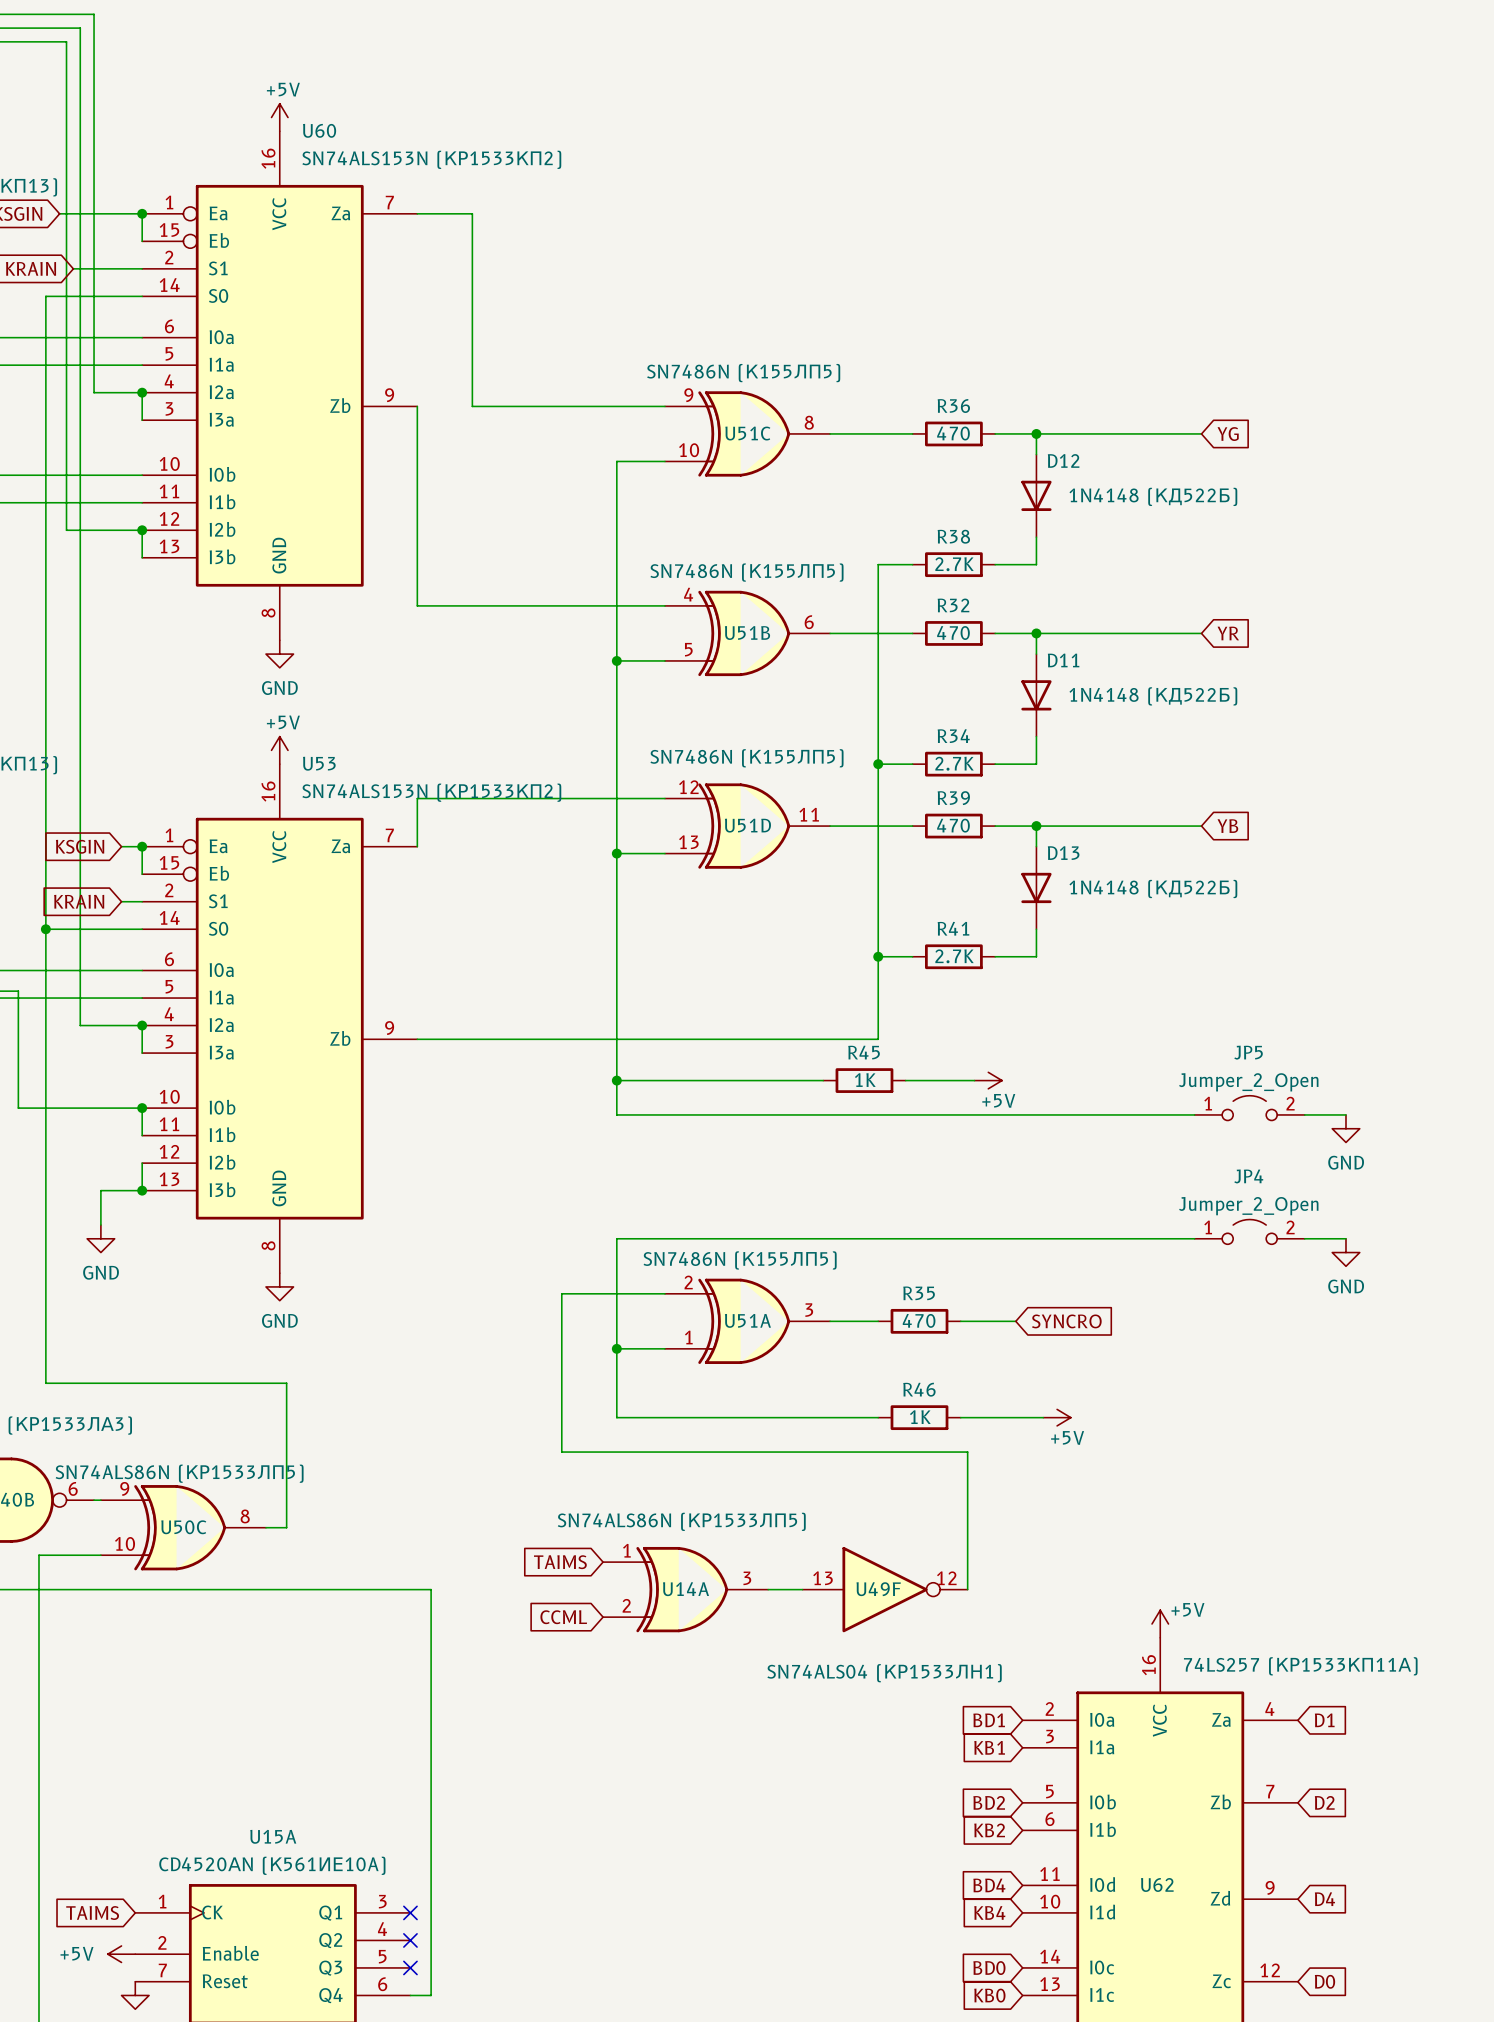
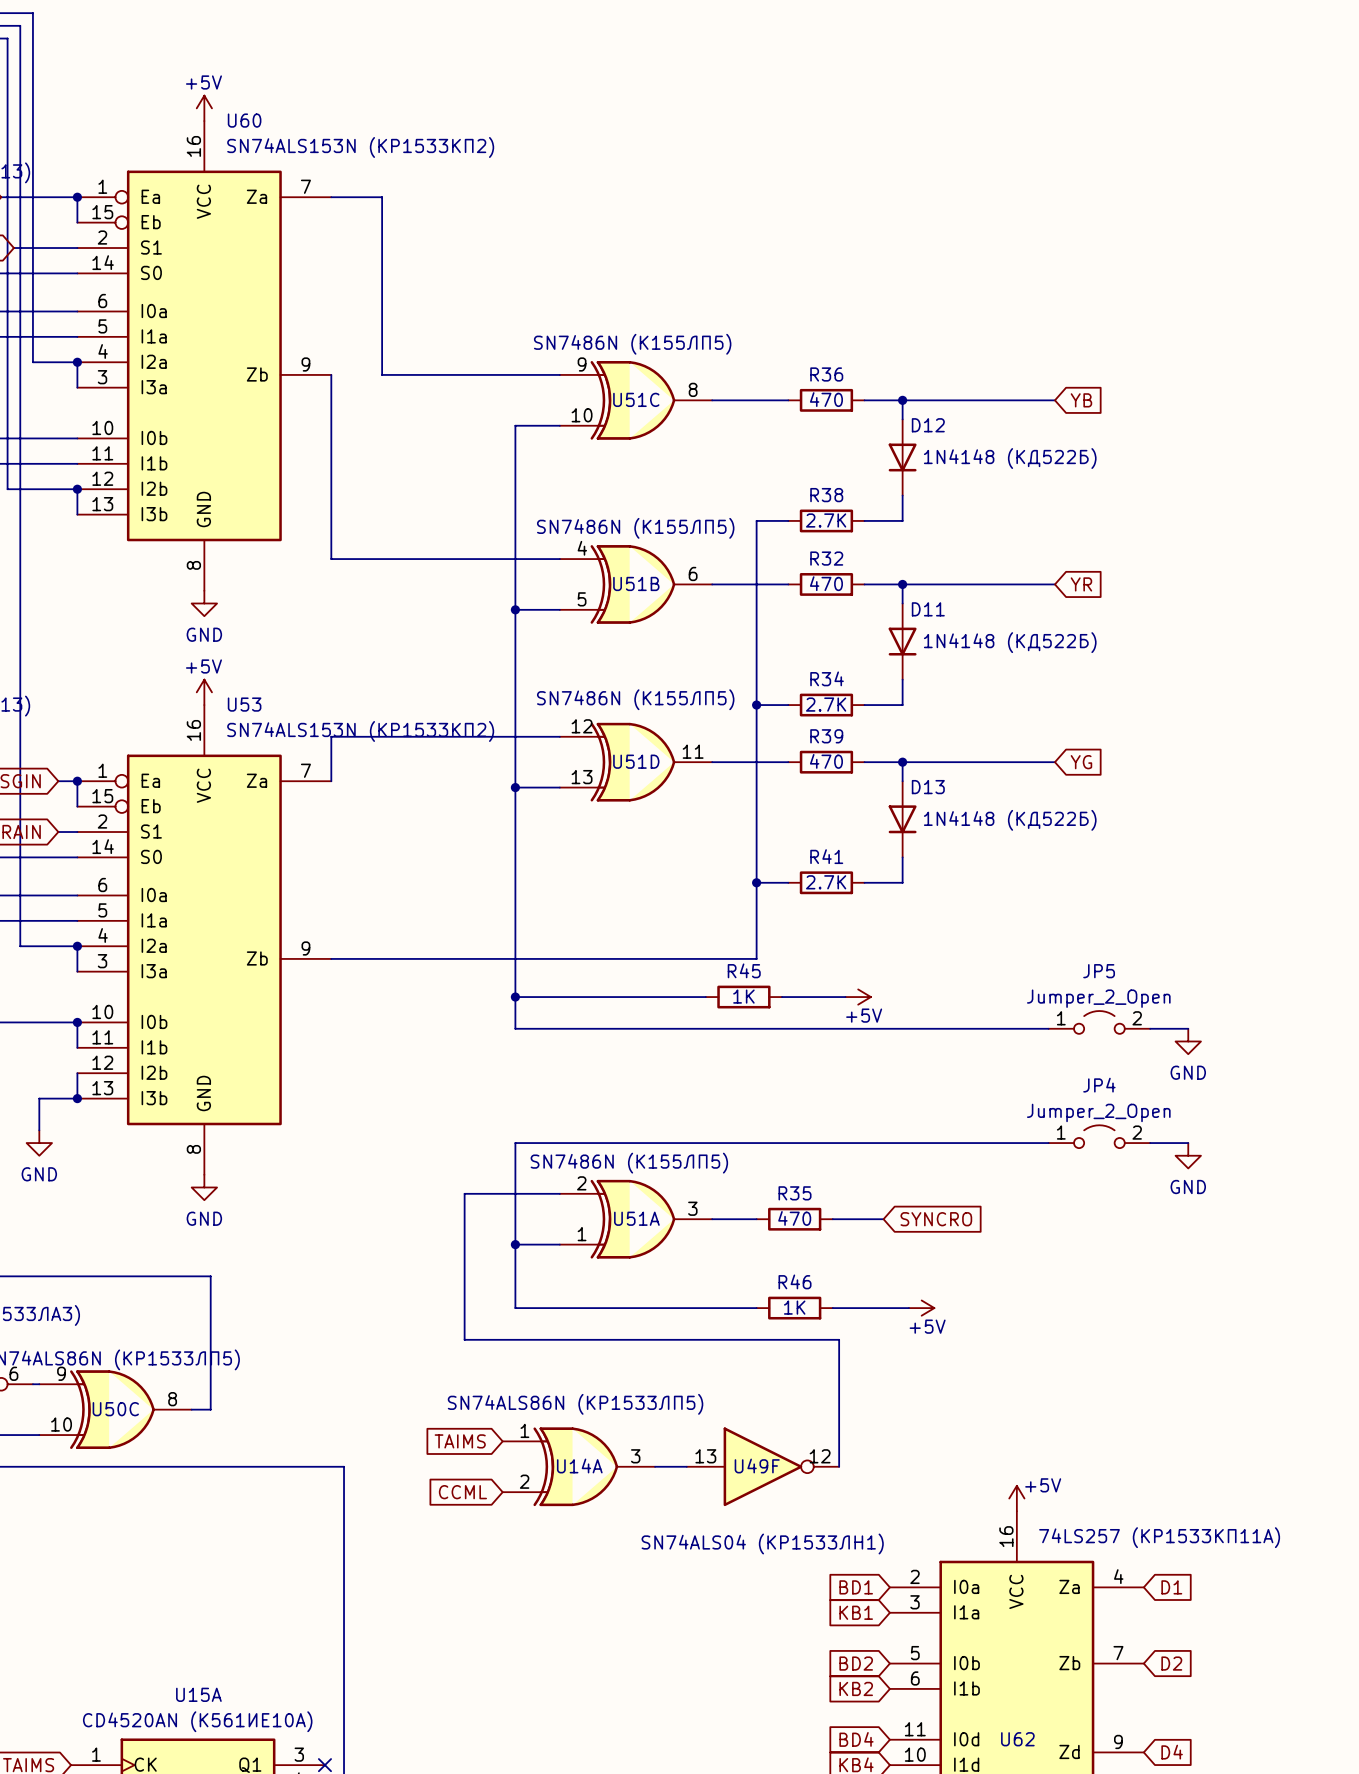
global label: YG (1228, 434) -> YB (1081, 400)
global label: YB (1227, 826) -> YG (1081, 762)

